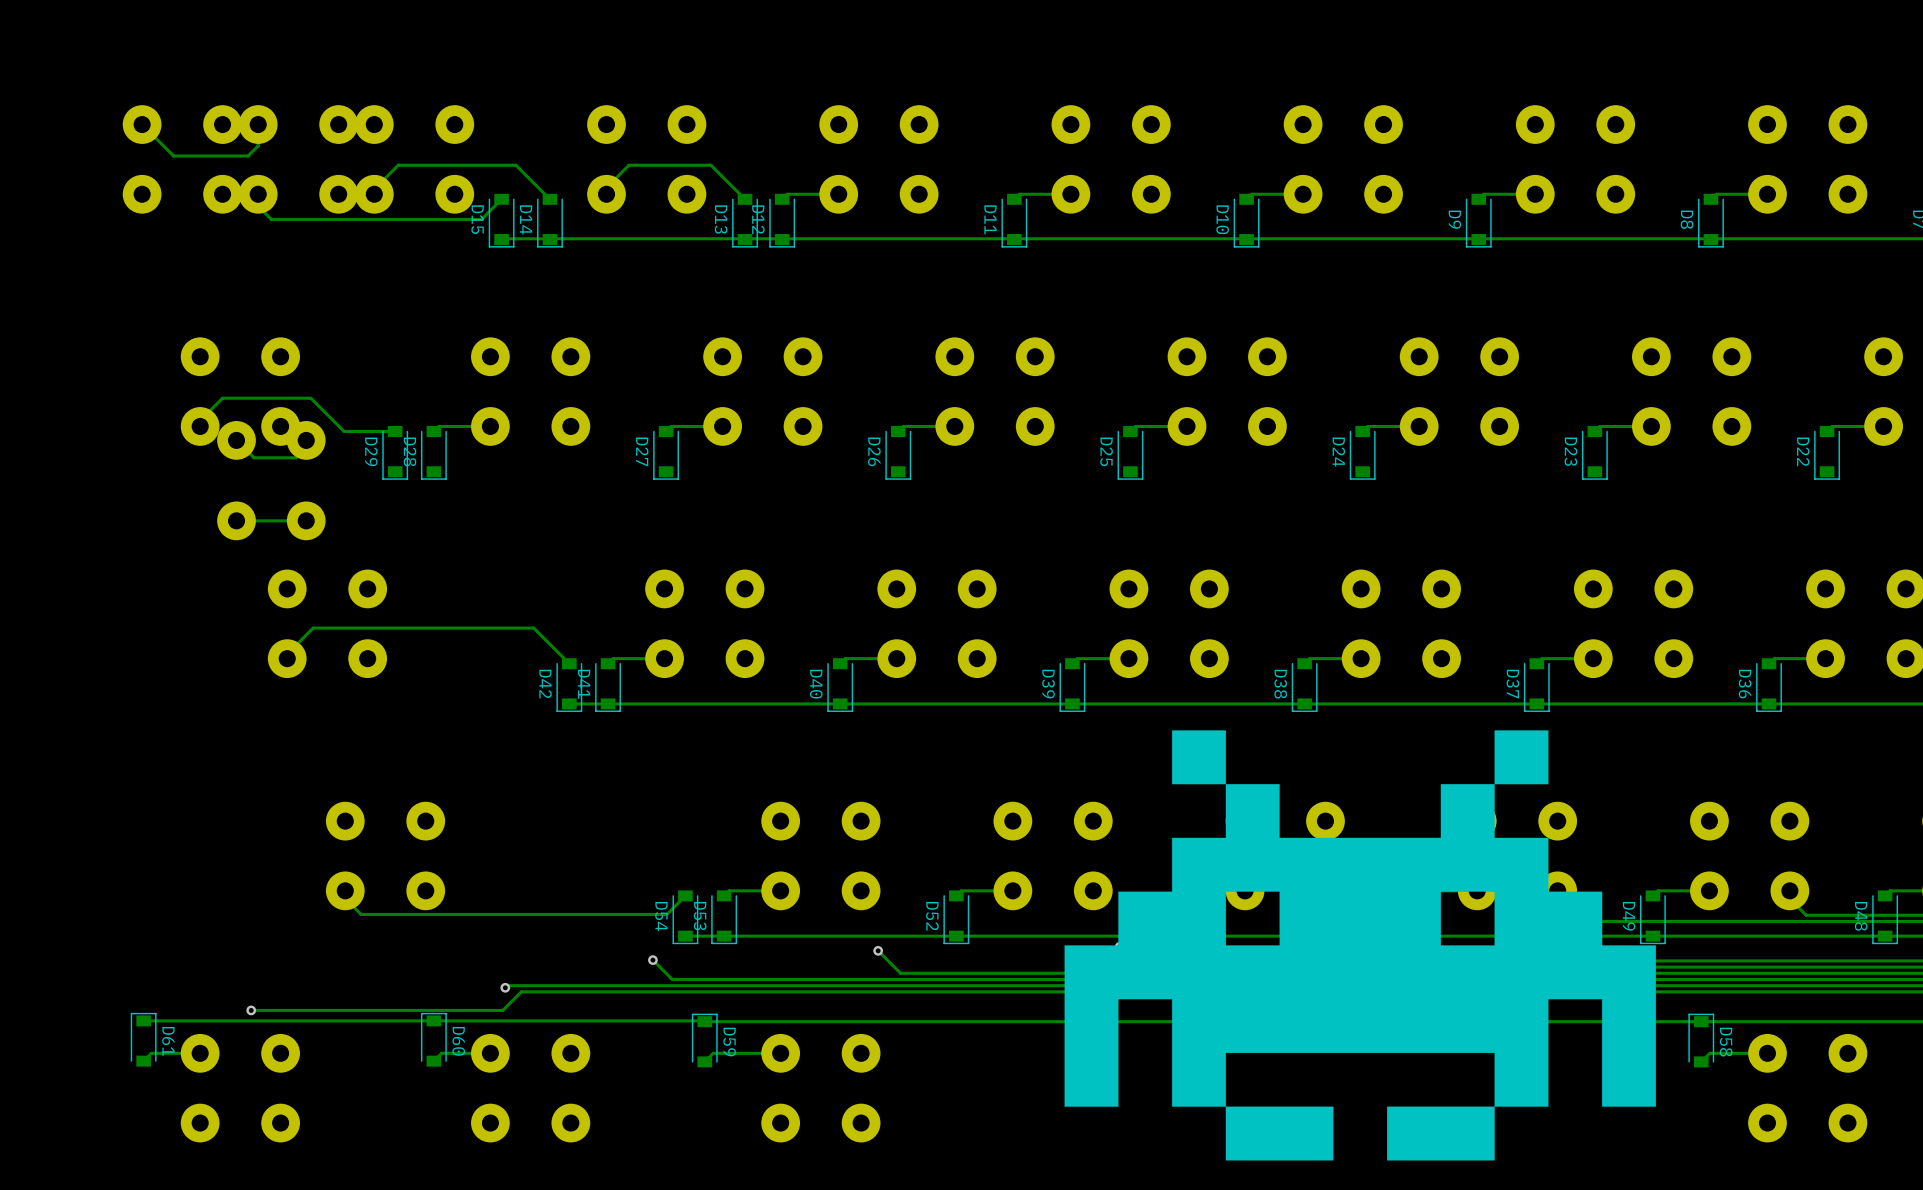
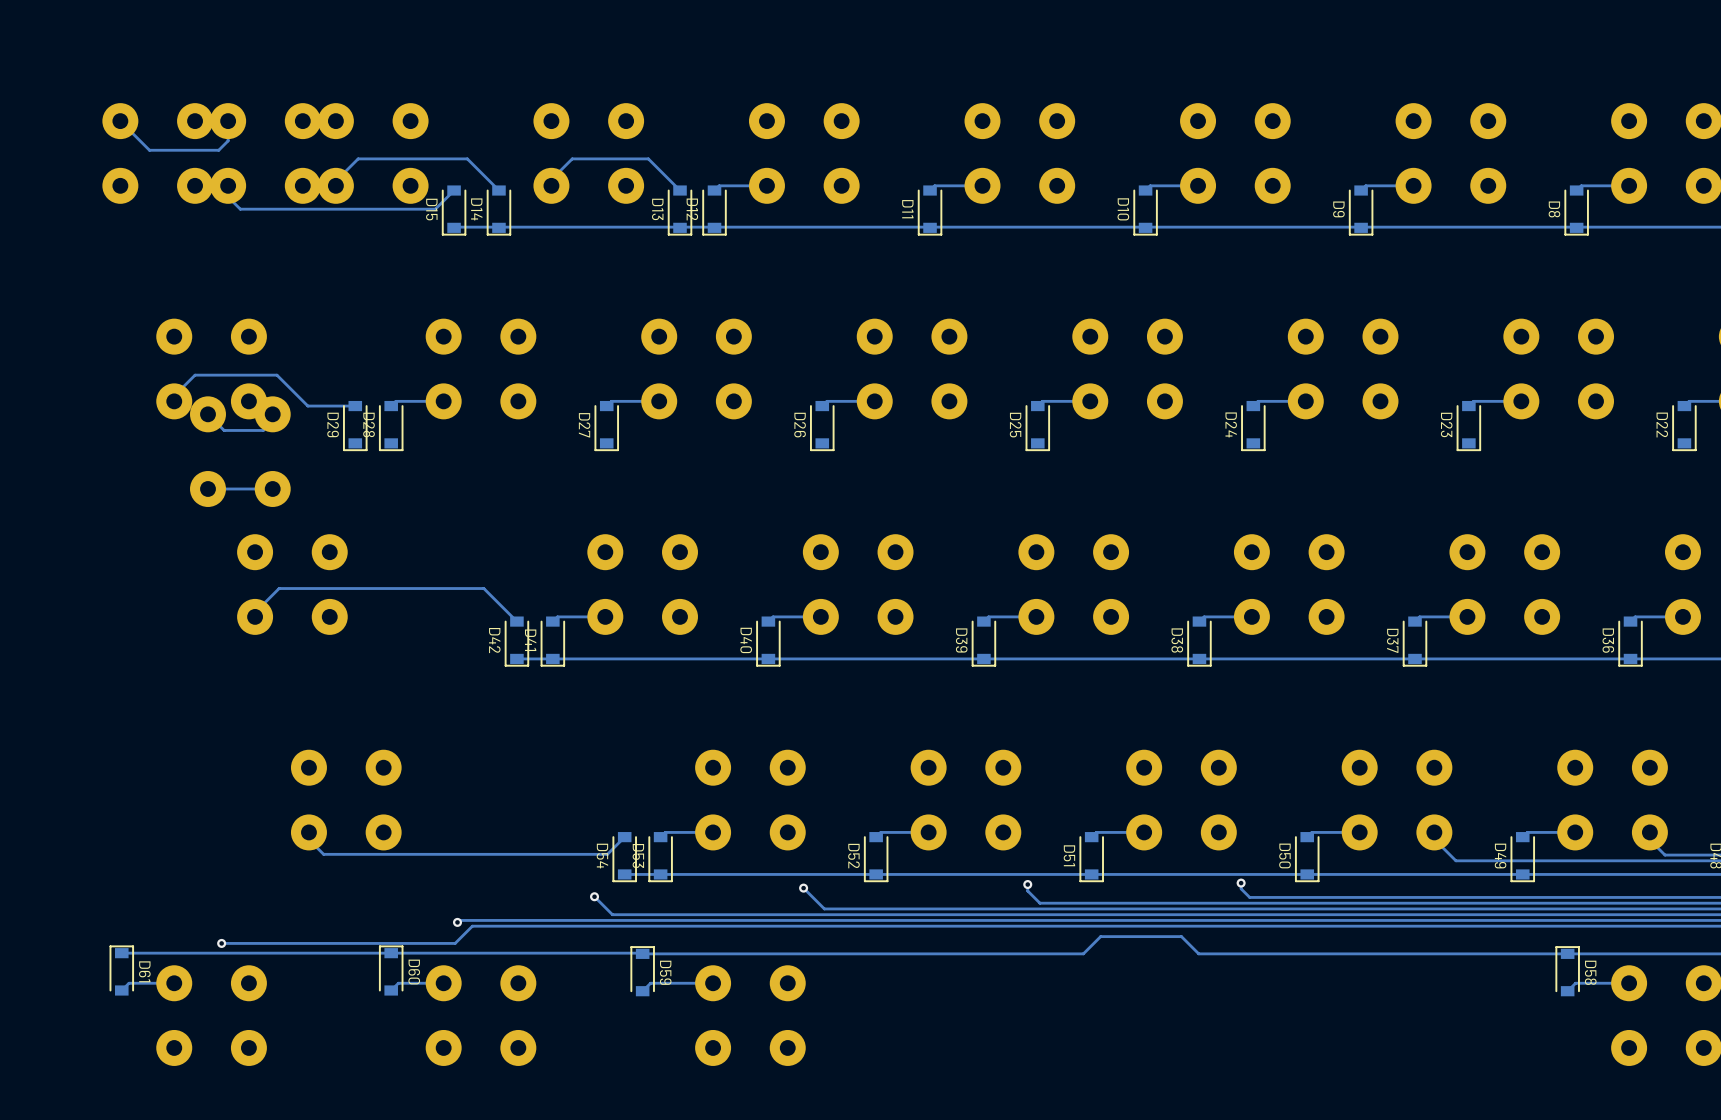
drawing: [1064, 730, 1656, 1161] -> none

